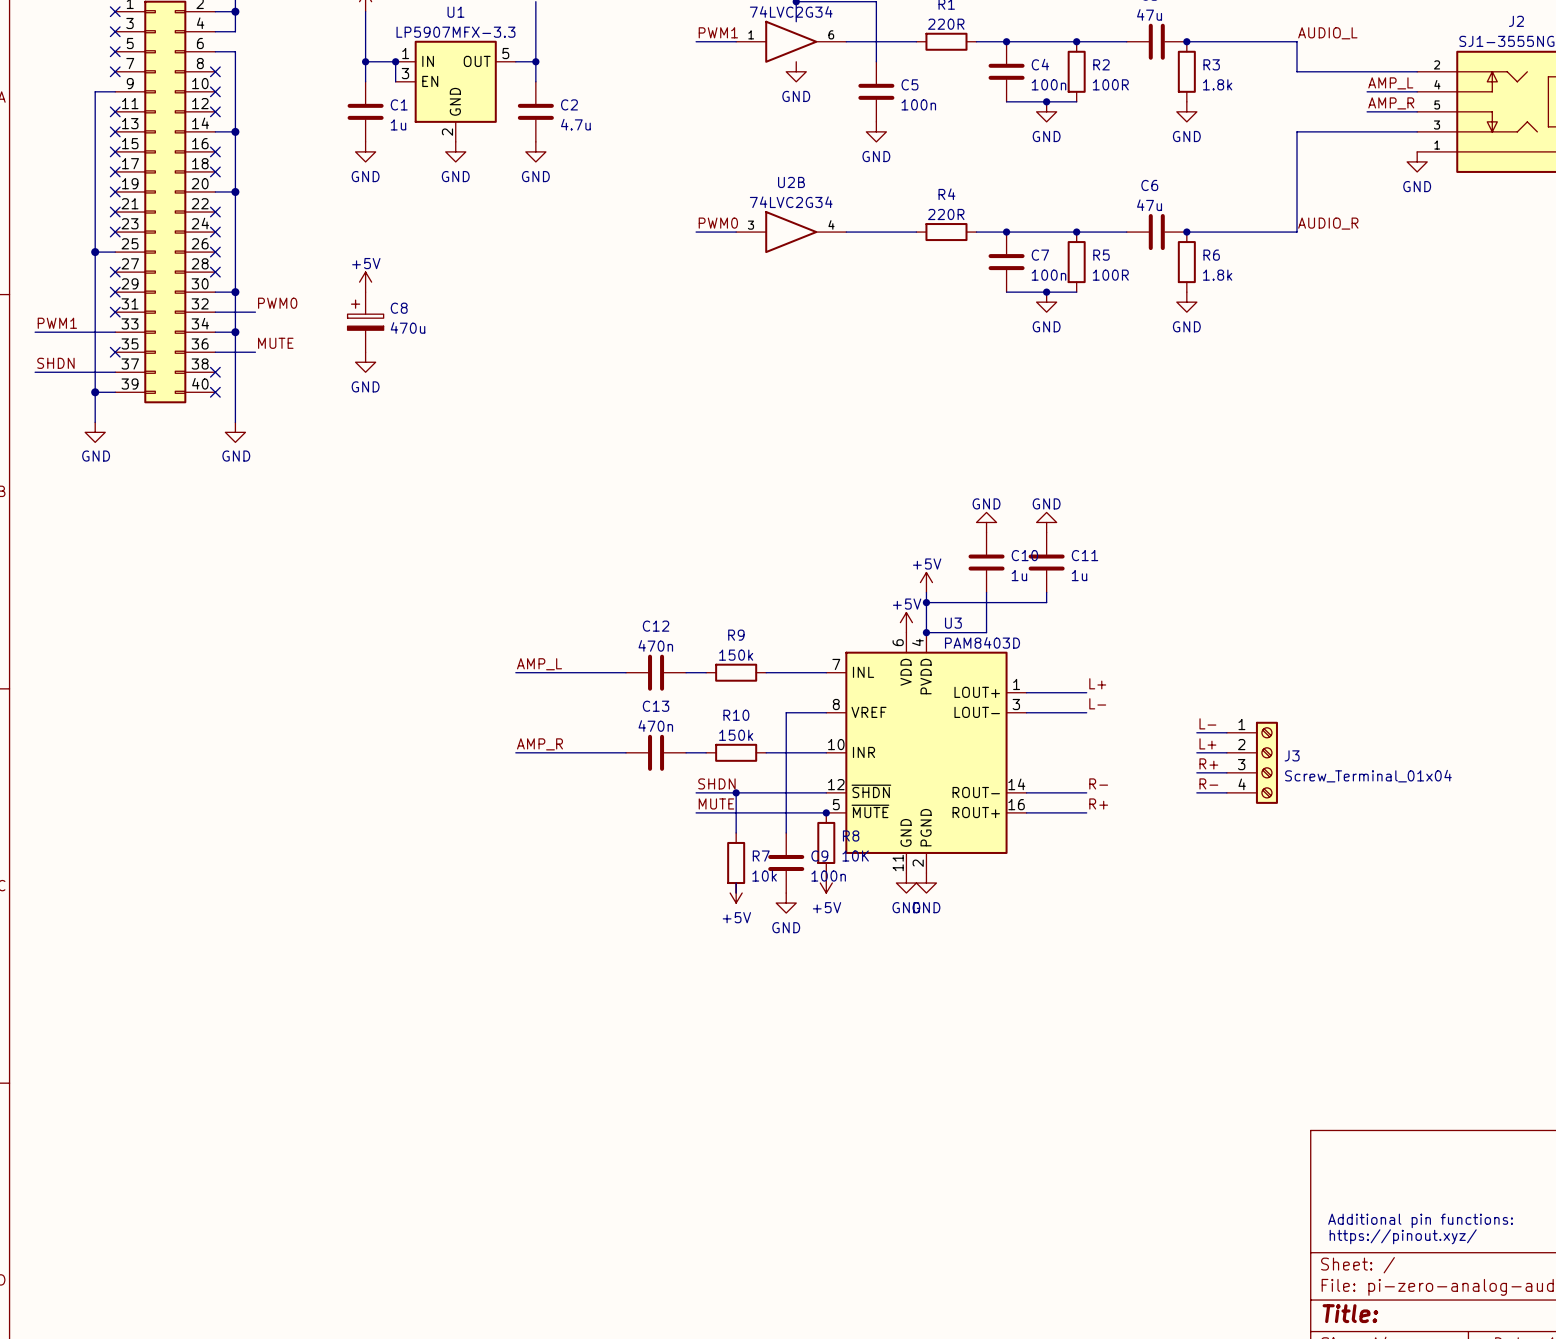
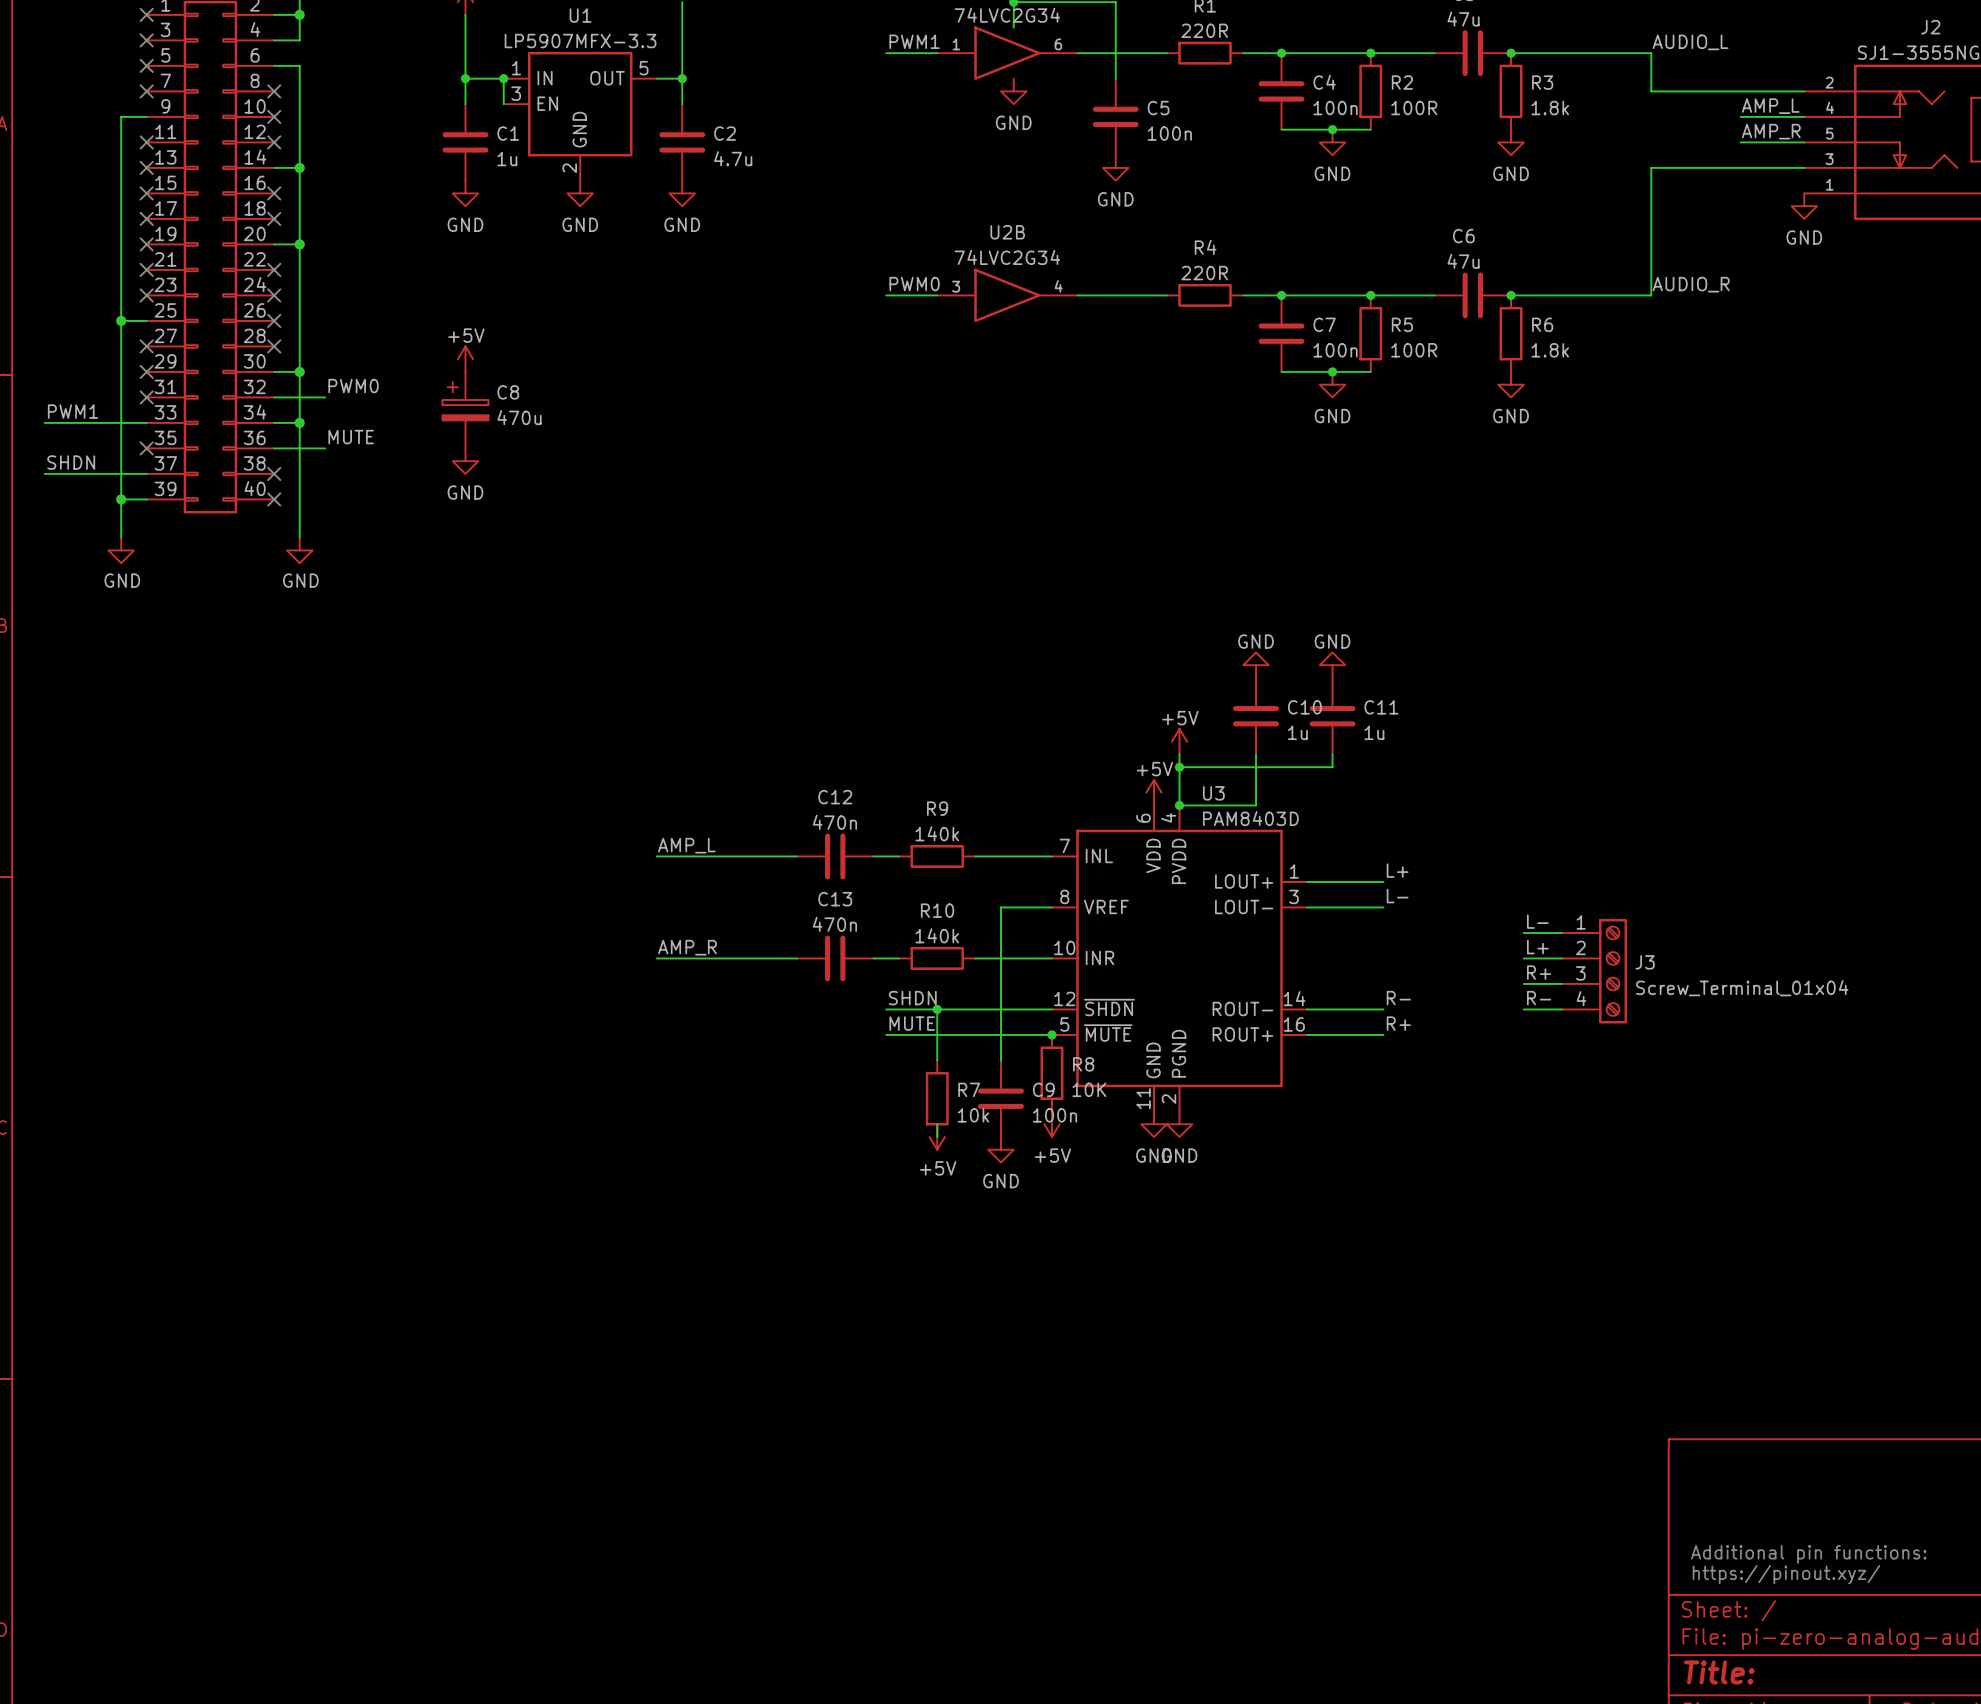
R9 value: 150k (736, 655) -> 140k (937, 833)
R10 value: 150k (736, 735) -> 140k (937, 935)

